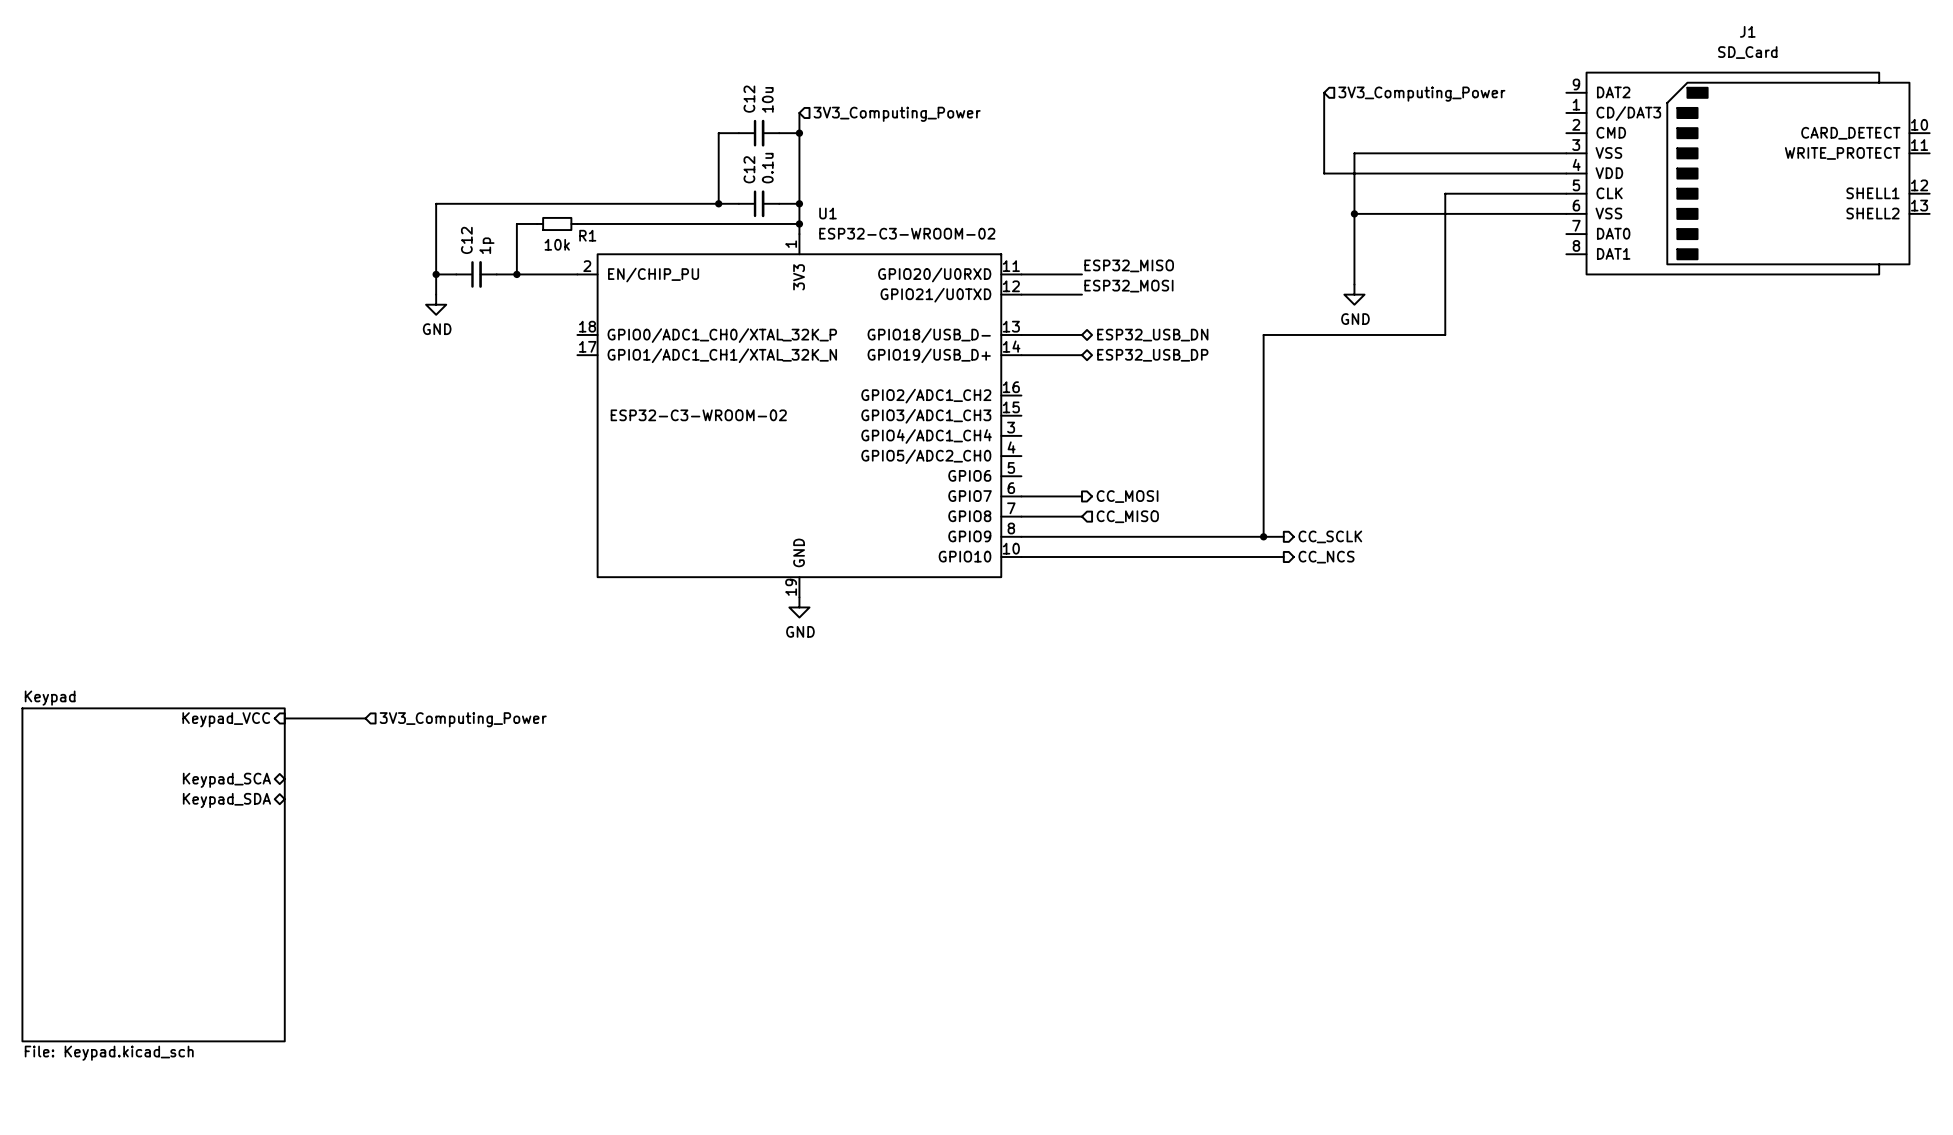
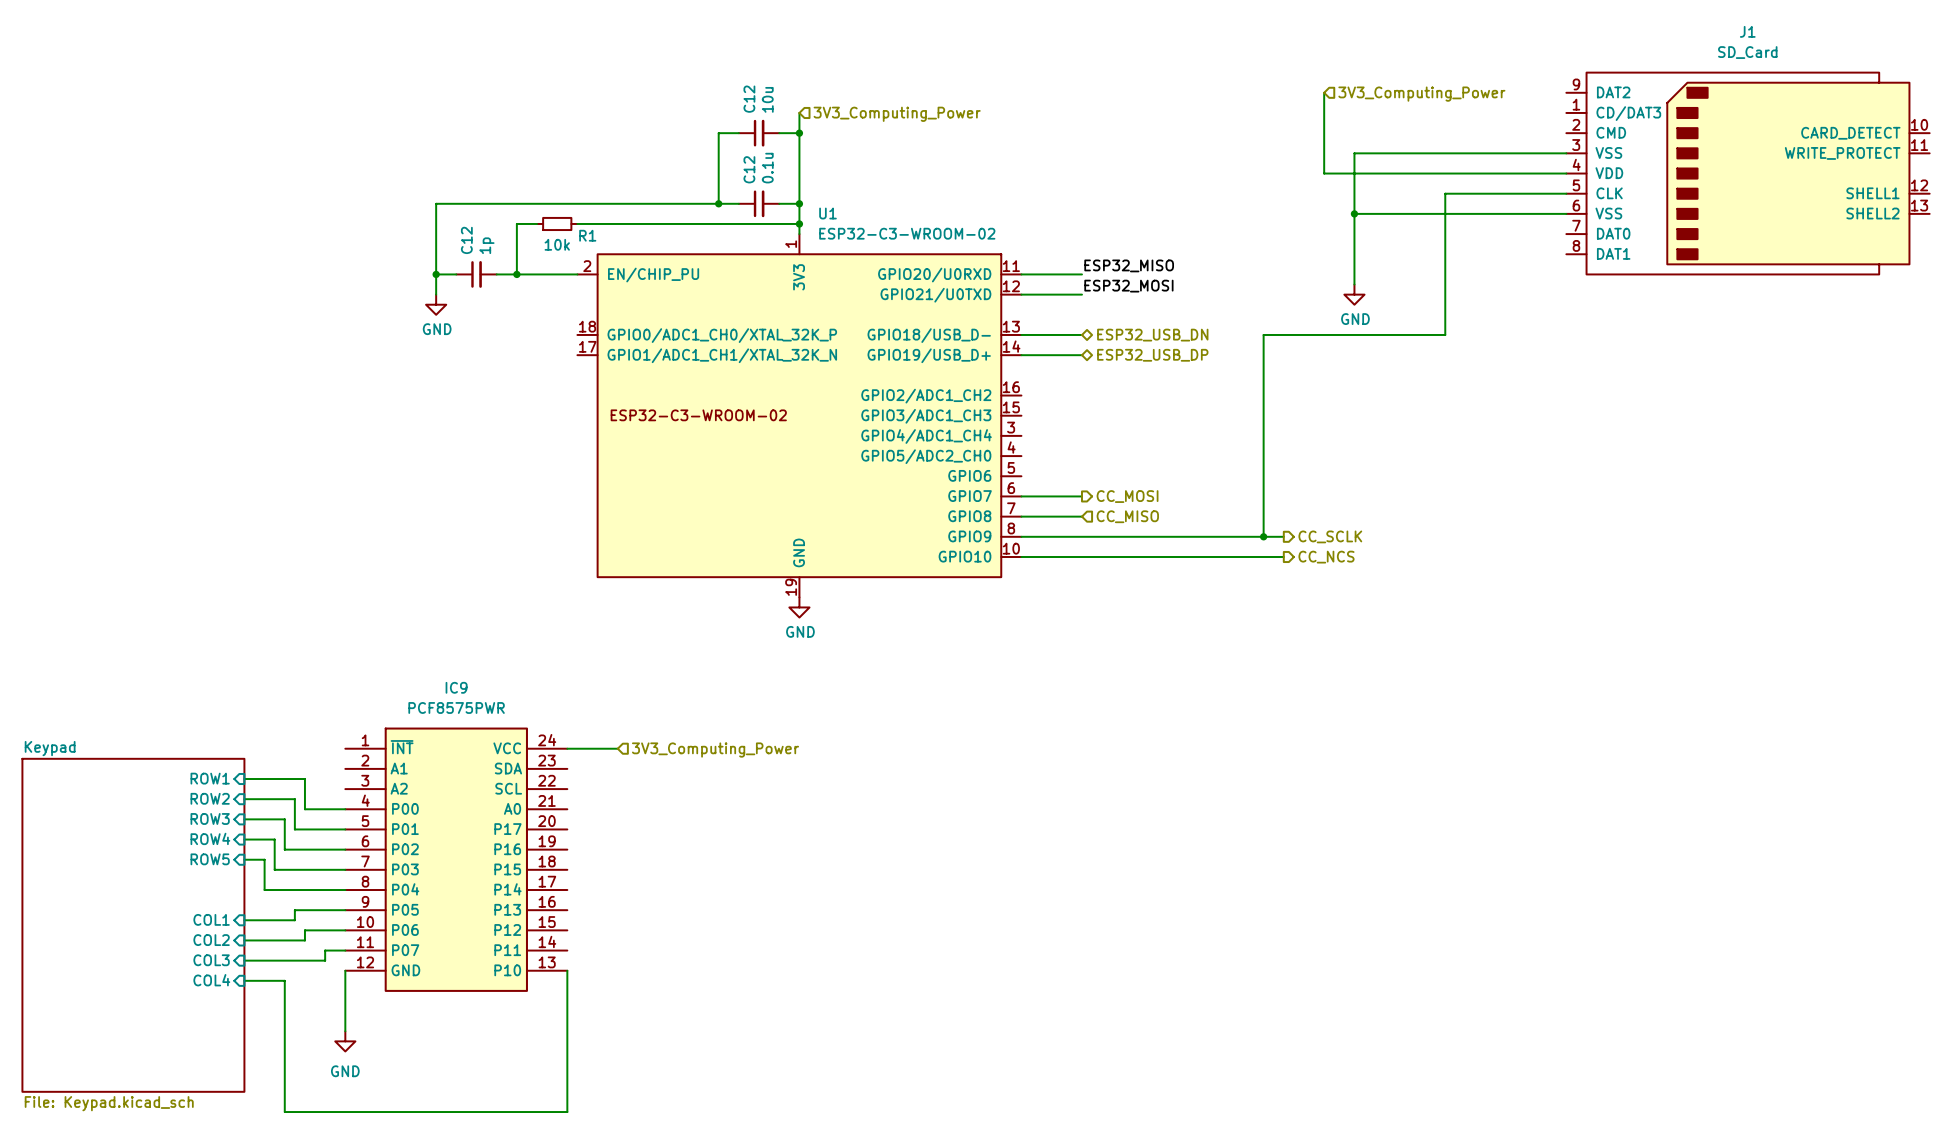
wire: (284, 718) (365, 718) -> none
sheet pin: Keypad_VCC (226, 719) -> none
hierarchical label: 3V3_Computing_Power (463, 719) -> none
wire: none -> (567, 748) (617, 748)
hierarchical label: none -> 3V3_Computing_Power (715, 750)
sheet pin: none -> ROW1 (210, 778)
wire: none -> (244, 779) (304, 779) (304, 809) (345, 809)
sheet pin: Keypad_SCA (226, 780) -> none
sheet pin: none -> ROW2 (210, 798)
wire: none -> (244, 799) (294, 799) (294, 829) (345, 829)
sheet pin: Keypad_SDA (226, 800) -> none
sheet pin: none -> ROW3 (210, 818)
wire: none -> (244, 819) (284, 819) (284, 849) (345, 849)
sheet pin: none -> ROW4 (210, 838)
wire: none -> (244, 839) (274, 839) (274, 869) (345, 869)
sheet pin: none -> ROW5 (210, 859)
wire: none -> (244, 859) (264, 859) (264, 890) (345, 890)
IC9: none -> PCF8575PWR (456, 859)
sheet Keypad: File: Keypad.kicad_sch (153, 874) -> none
wire: none -> (345, 910) (294, 910) (294, 920) (244, 920)
sheet pin: none -> COL1 (211, 919)
sheet Keypad: none -> File: Keypad.kicad_sch (133, 925)
wire: none -> (345, 930) (304, 930) (304, 940) (244, 940)
sheet pin: none -> COL2 (211, 940)
wire: none -> (345, 950) (325, 950) (325, 960) (244, 960)
sheet pin: none -> COL3 (211, 960)
wire: none -> (345, 970) (345, 1031)
wire: none -> (567, 970) (567, 1112) (284, 1112) (284, 980) (244, 980)
sheet pin: none -> COL4 (211, 980)
power symbol: none -> GND (345, 1041)

